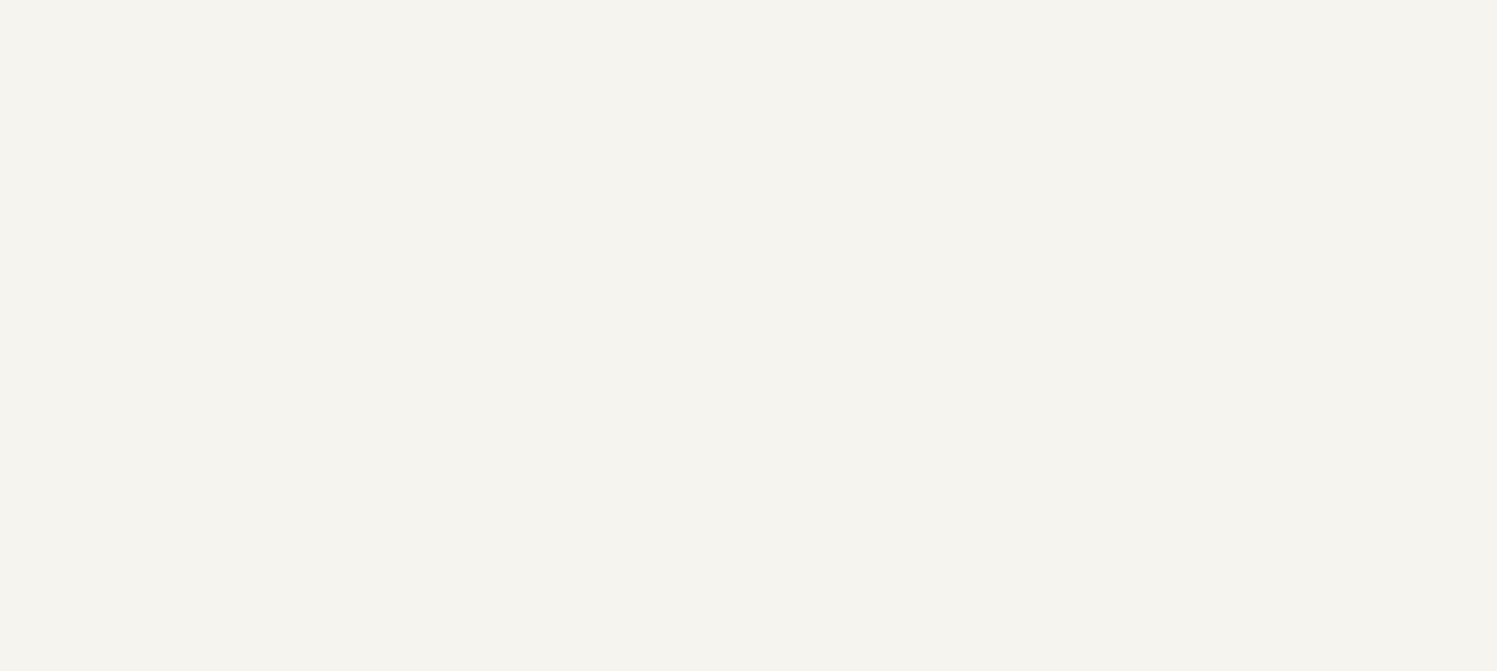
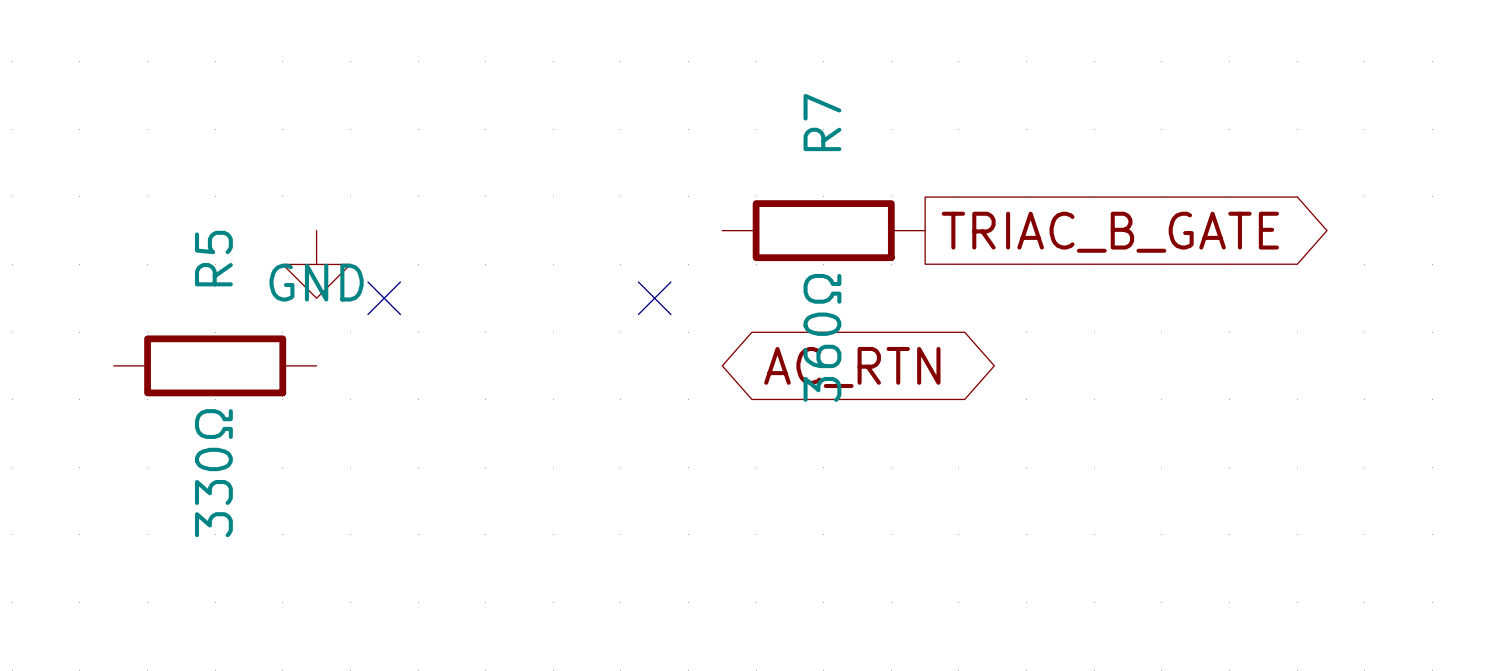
R7: none -> 360Ω (823, 230)
global label: none -> TRIAC_B_GATE (1110, 232)
power symbol: none -> GND (316, 264)
no-connect mark: none -> (384, 298)
no-connect mark: none -> (654, 298)
R5: none -> 330Ω (215, 365)
global label: none -> AC_RTN (852, 367)

